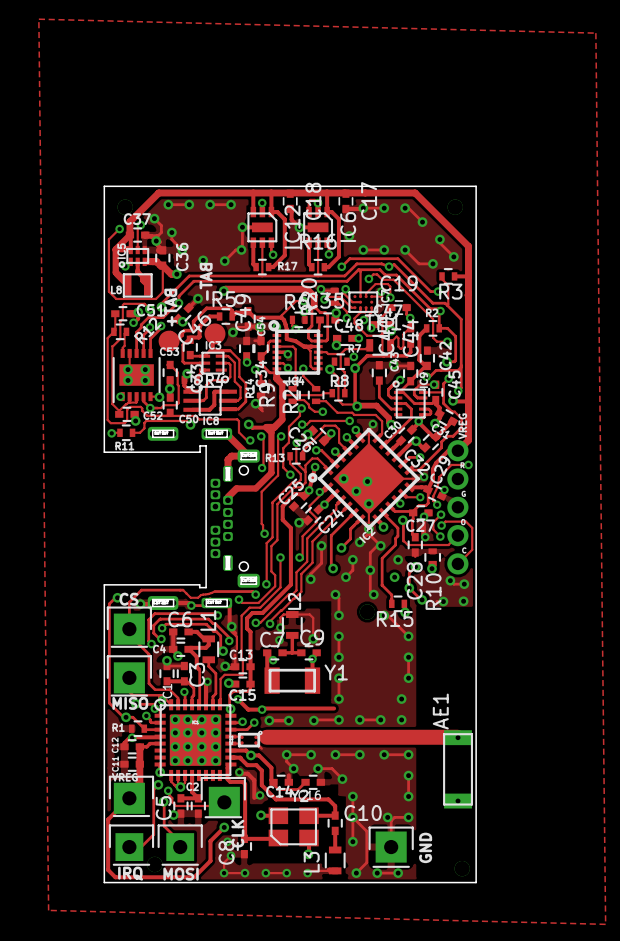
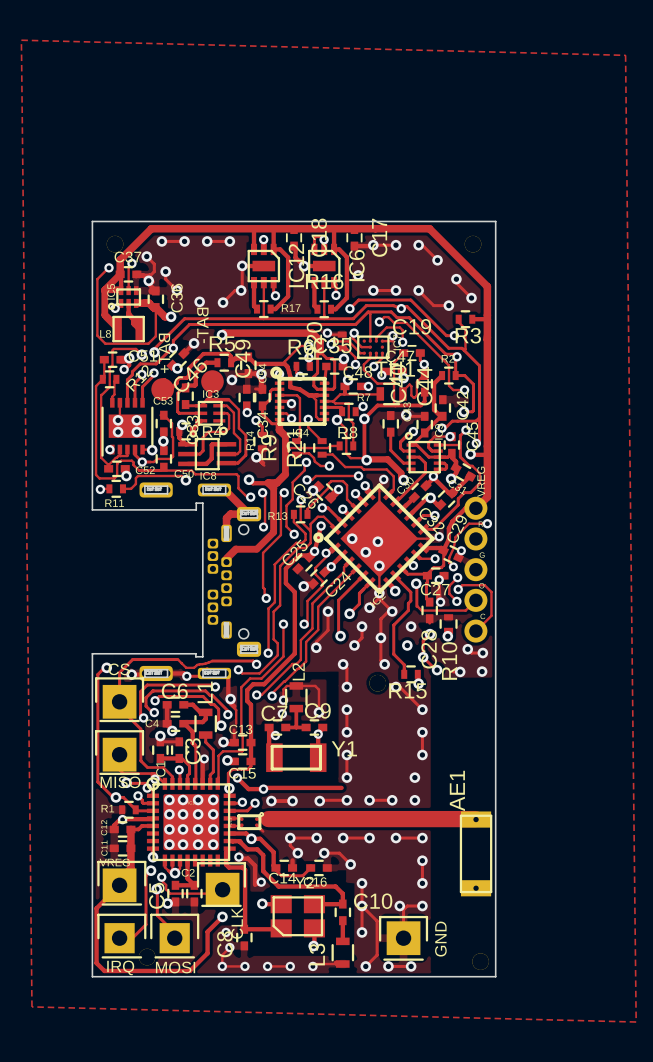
via position: (336, 345) -> (348, 380)
track: (368, 345) (365, 349) (345, 349) (340, 354) -> (379, 394) (340, 394) (333, 401)
track: none -> (324, 407) (342, 407)

